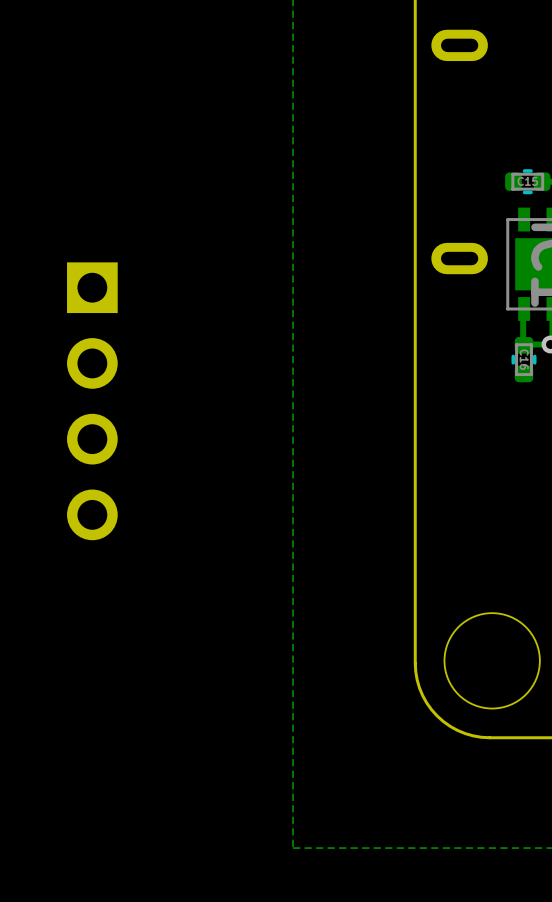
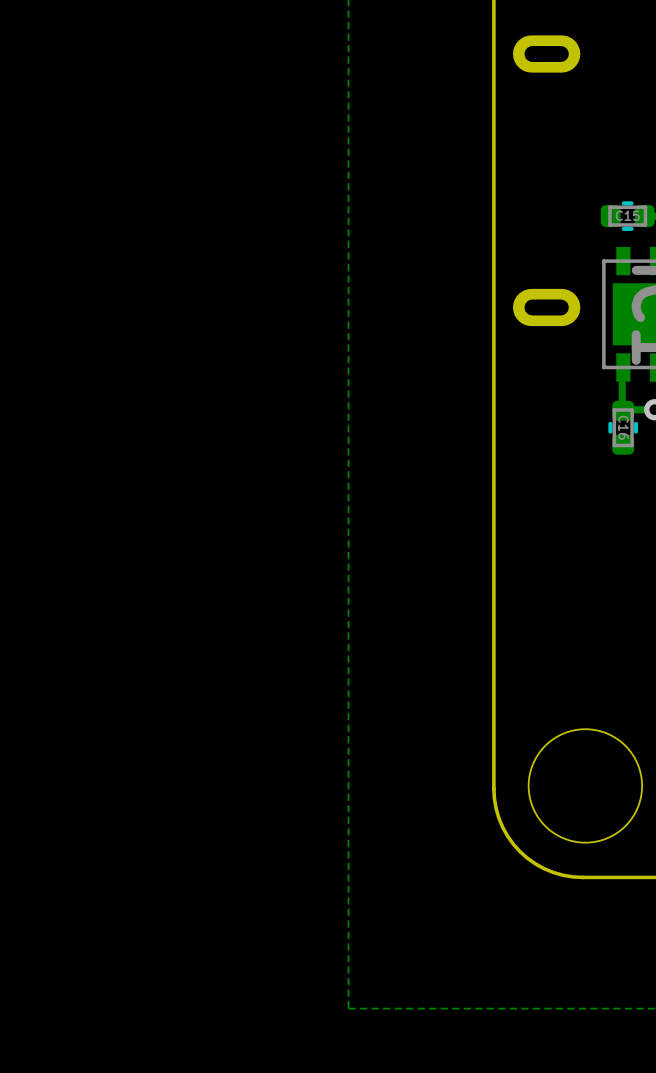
part: (92, 401) -> none

